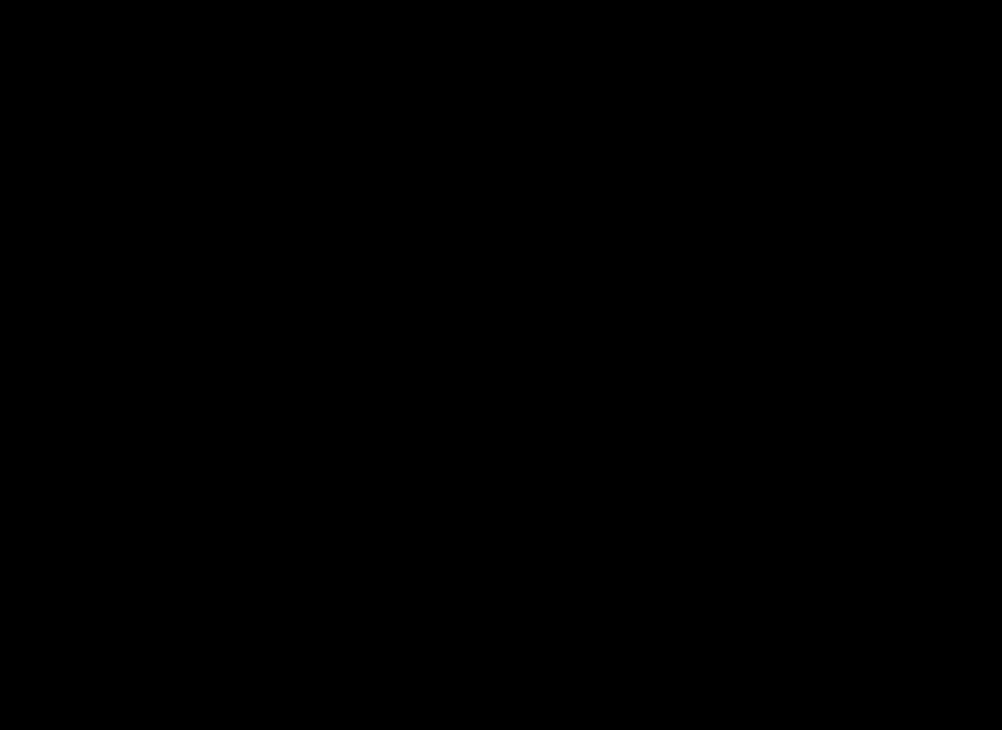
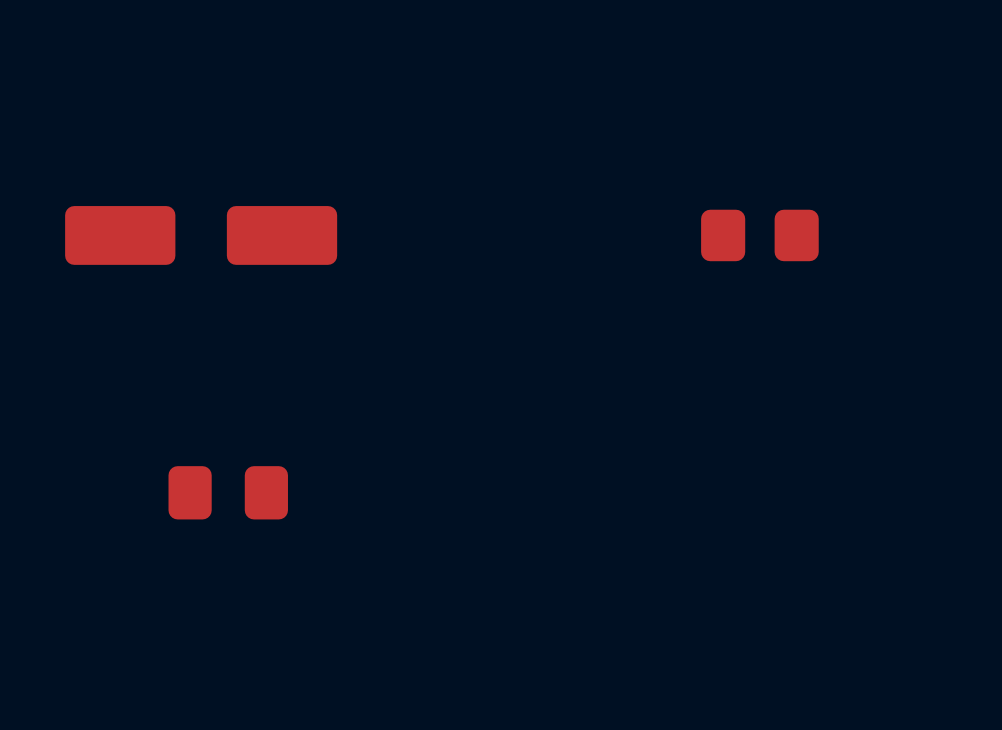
part: none -> (201, 235)
part: none -> (759, 235)
part: none -> (228, 492)

